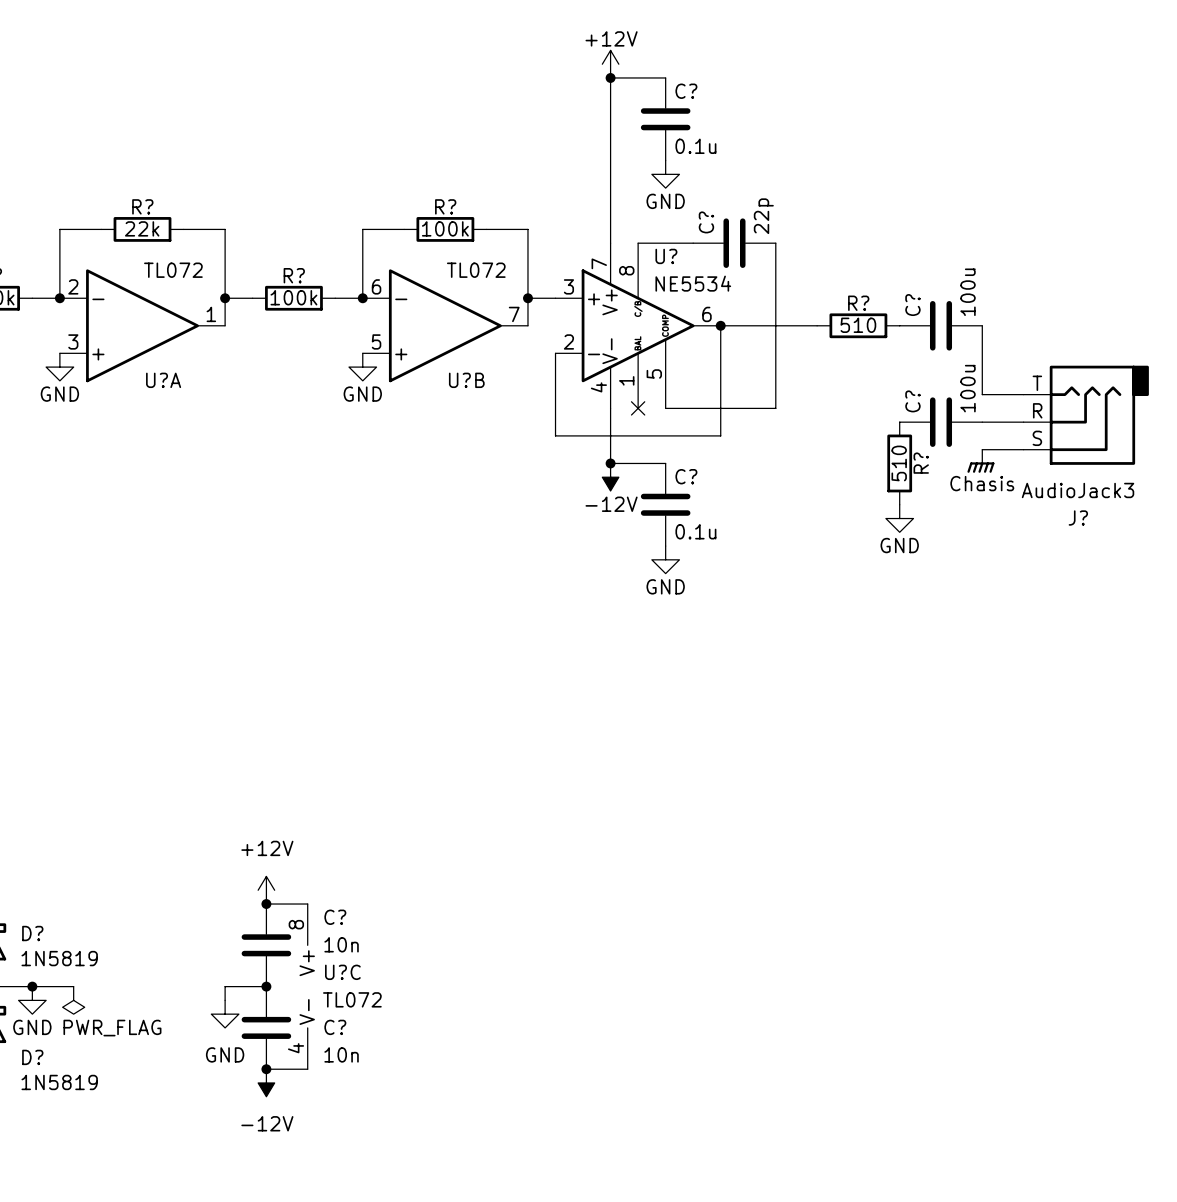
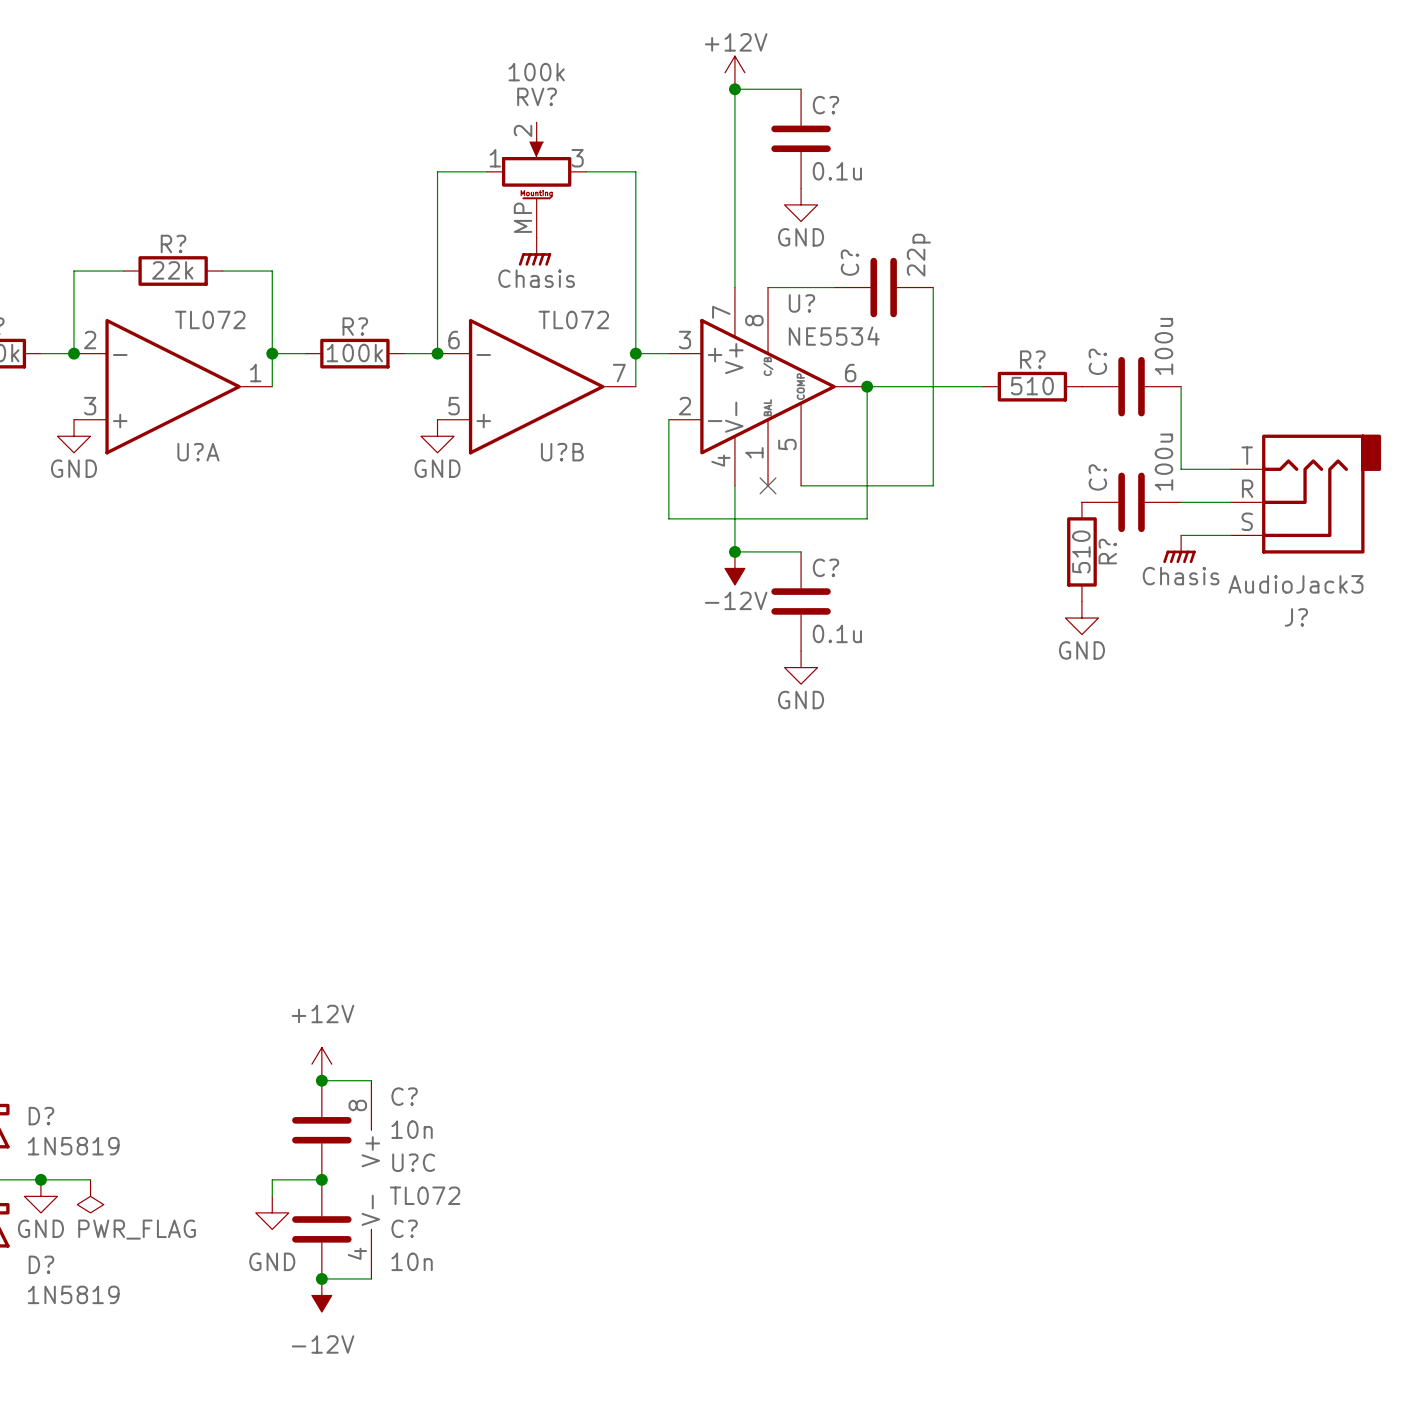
RV?: none -> 100k (536, 180)
power symbol: none -> Chasis (535, 251)
wire: (362, 229) (404, 229) -> (437, 271) (437, 171) (487, 171)
R?: 100k (445, 229) -> none
wire: (486, 229) (527, 229) -> (586, 171) (635, 171) (635, 271)

